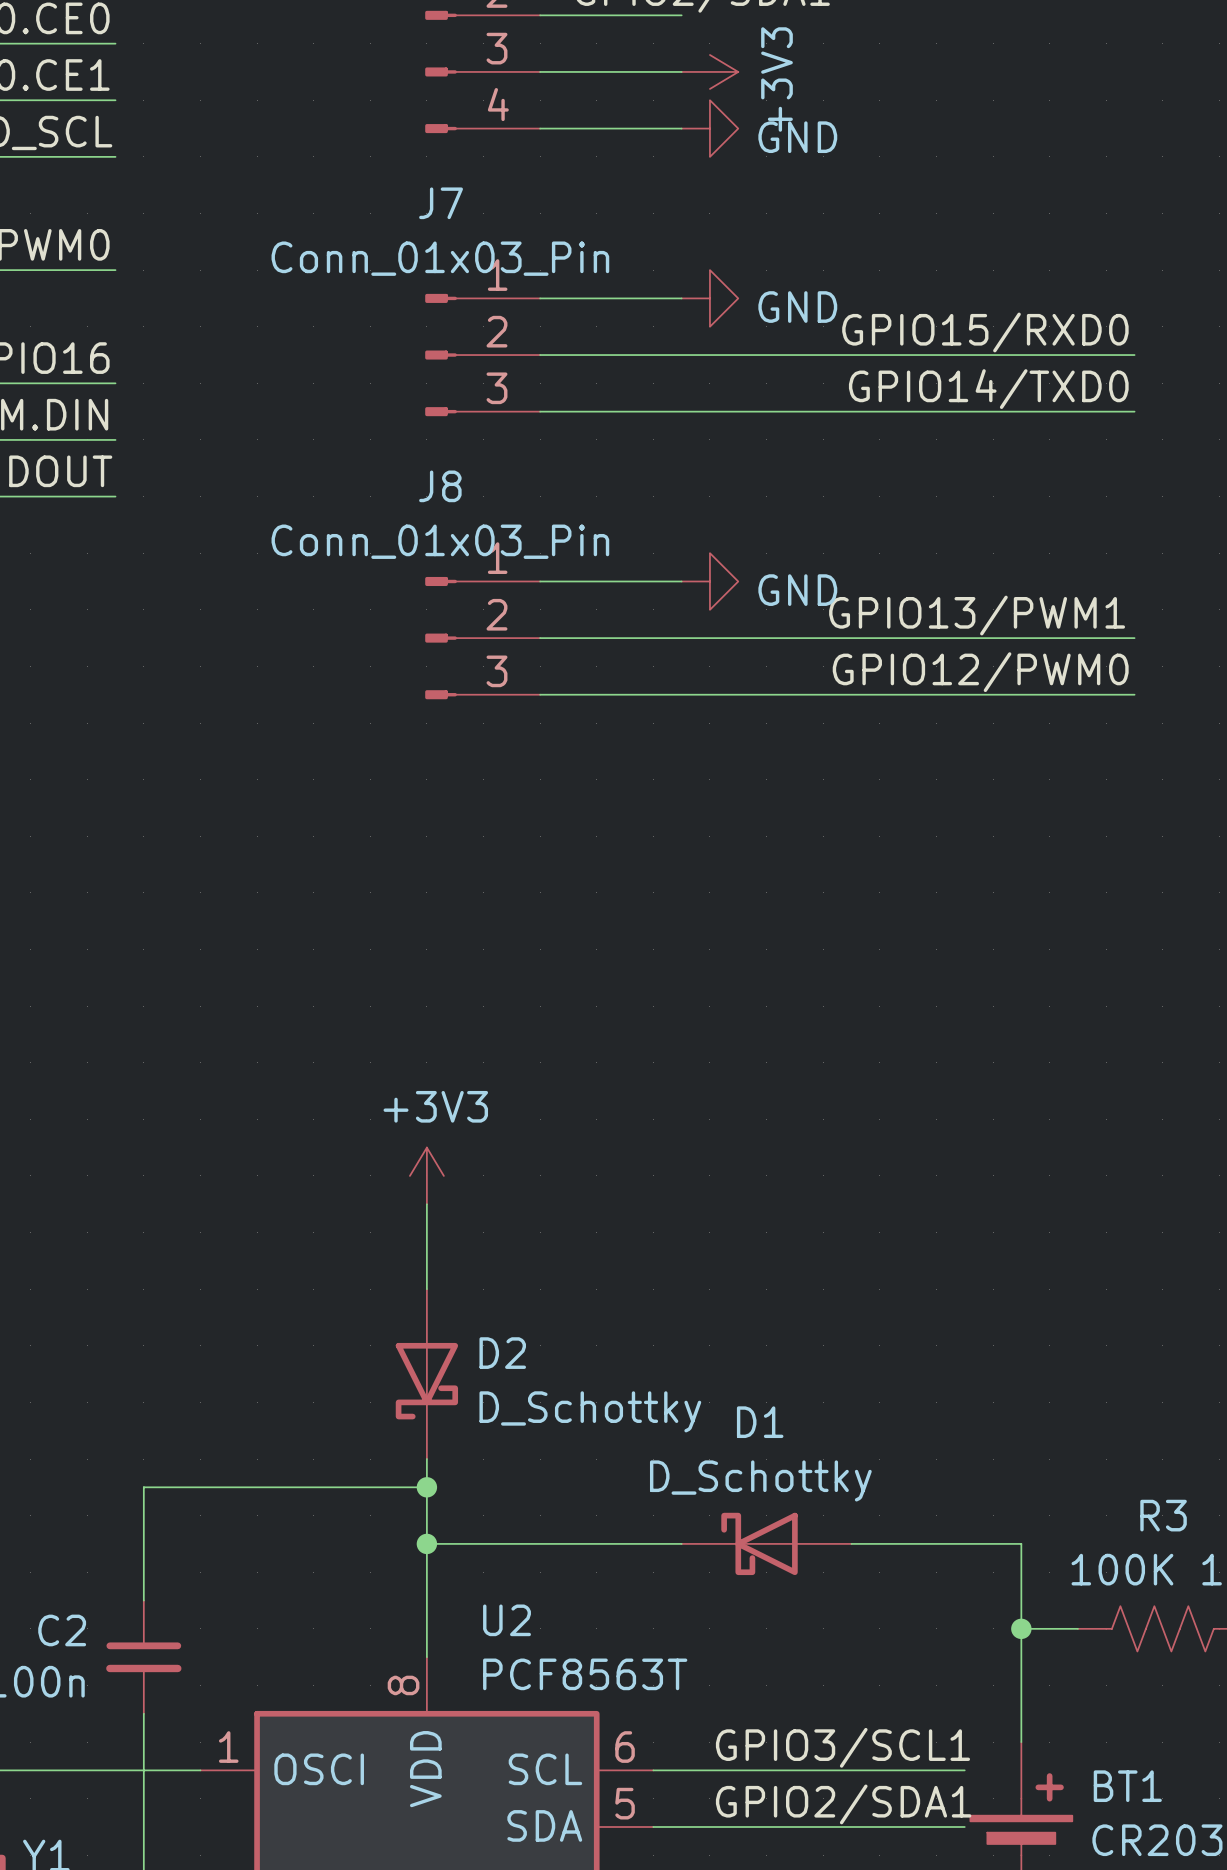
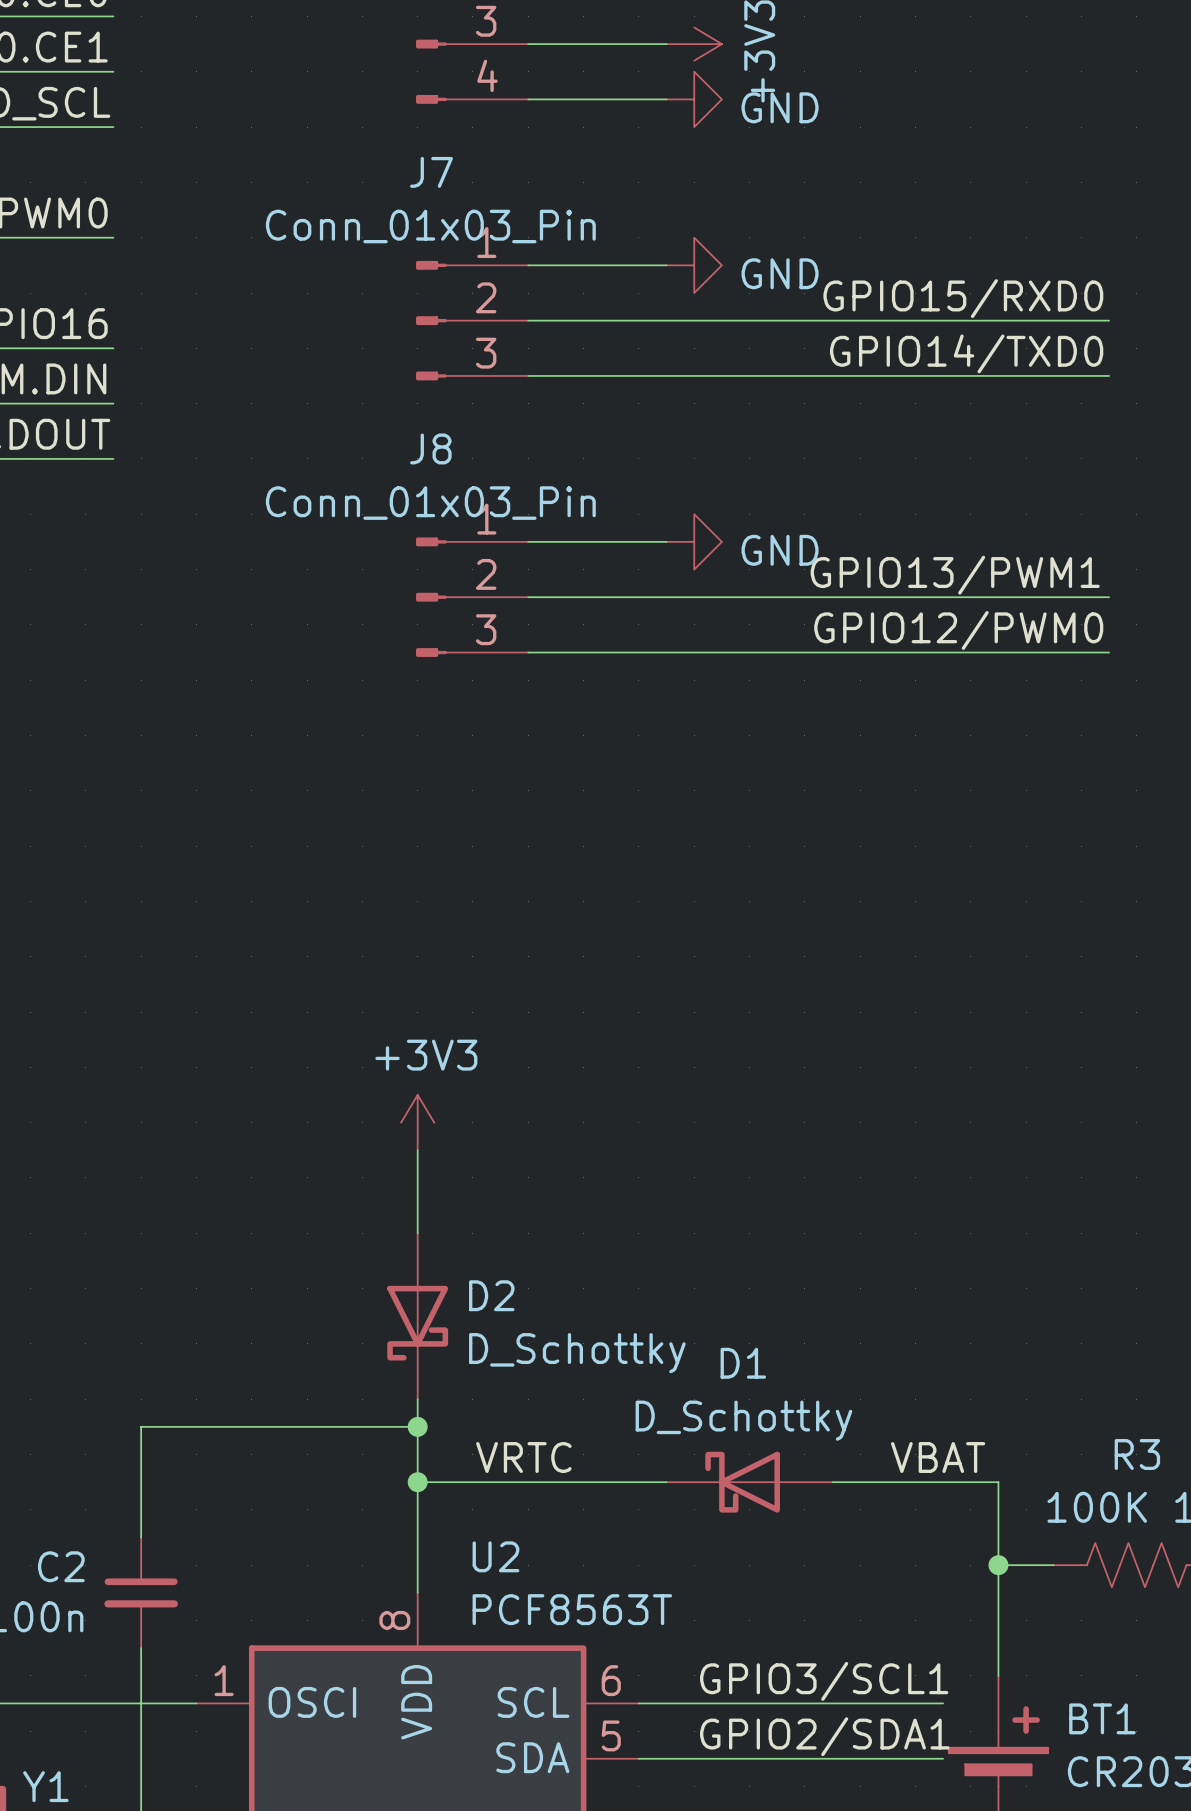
label: none -> VRTC (523, 1457)
label: none -> VBAT (938, 1457)

